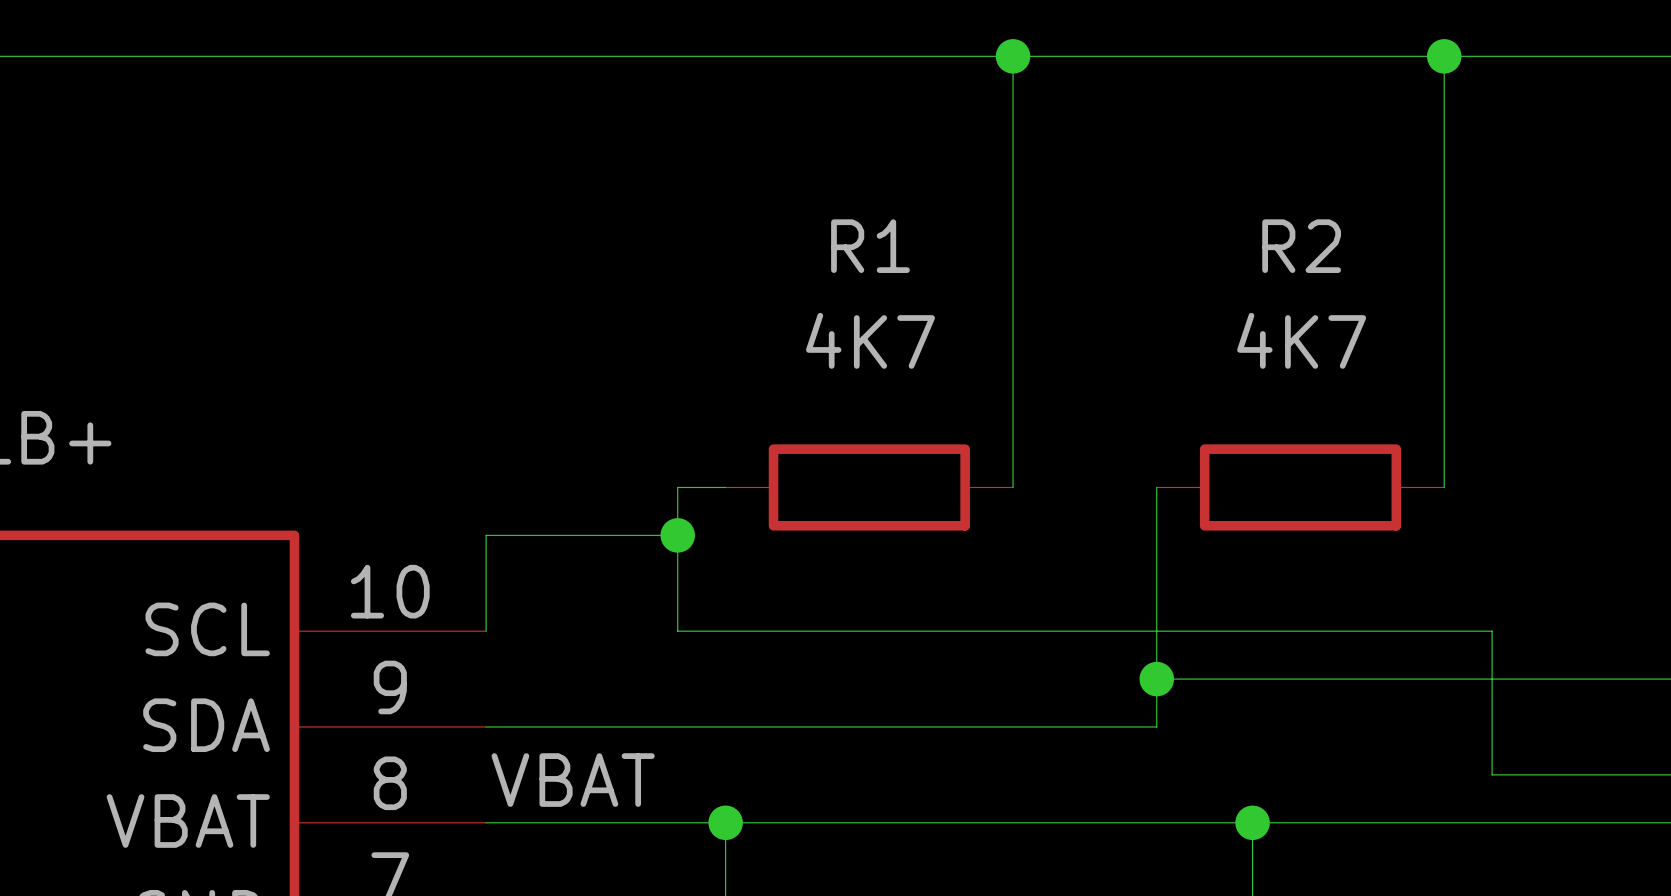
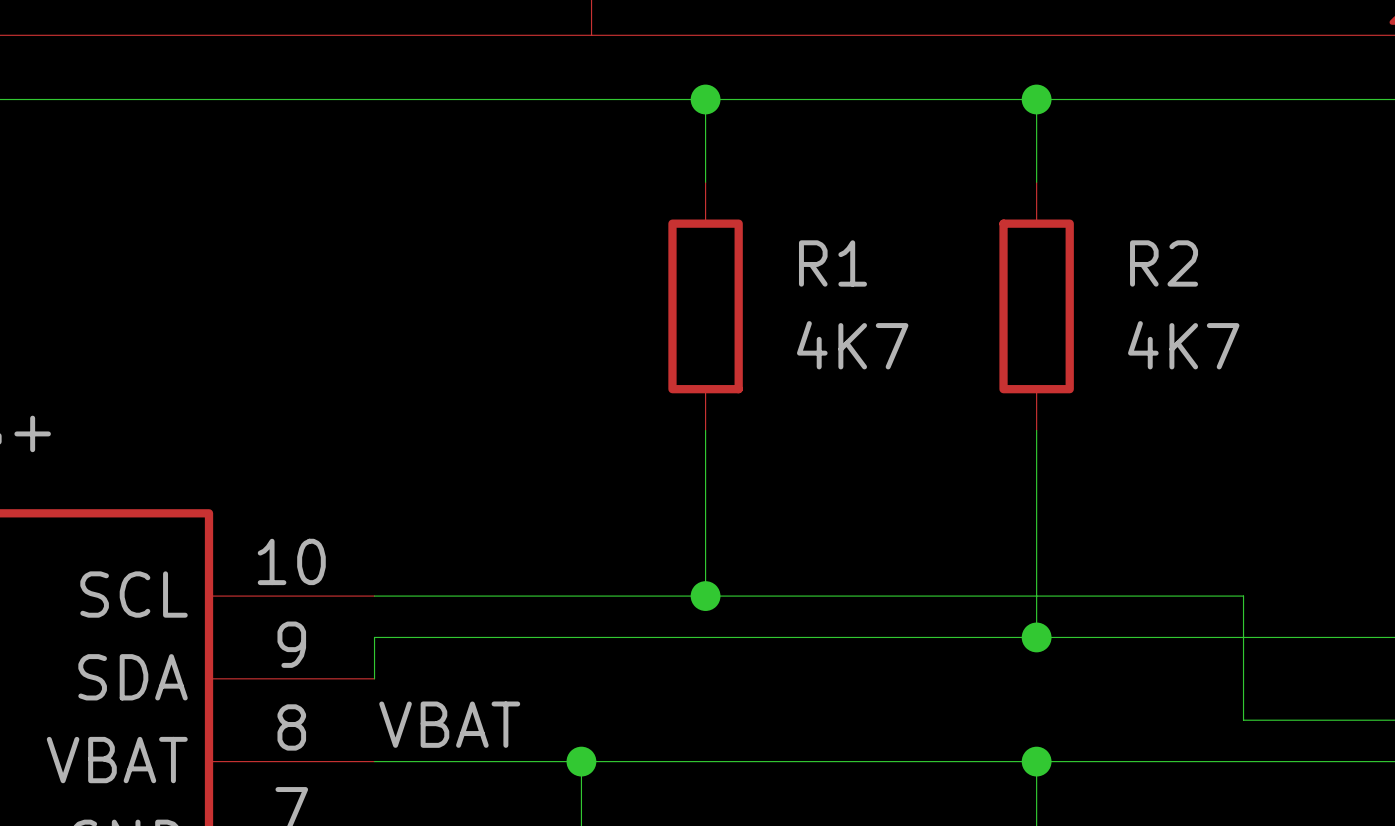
wire: none -> (705, 99) (705, 182)
junction: none -> (705, 99)
wire: (1013, 56) (1013, 487) -> none
junction: (1013, 56) -> none
wire: none -> (1036, 99) (1036, 182)
junction: none -> (1036, 99)
wire: (1444, 56) (1444, 487) -> none
junction: (1444, 56) -> none
R1 name position: R1 (870, 246) -> R1 (832, 263)
R2 name position: R2 (1301, 246) -> R2 (1164, 263)
wire: none -> (705, 430) (705, 596)
wire: none -> (1036, 430) (1036, 637)
wire: (725, 487) (677, 487) (677, 631) -> none
R1 rotation: 0° (869, 487) -> 90° clockwise (705, 306)
R1 position: (869, 487) -> (705, 306)
wire: (1156, 487) (1156, 726) (486, 726) -> (953, 637) (374, 637) (374, 678)
R2 rotation: 0° (1300, 487) -> 90° clockwise (1036, 306)
R2 position: (1300, 487) -> (1036, 306)
wire: (677, 535) (486, 535) (486, 631) -> (540, 596) (374, 596)
junction: (677, 535) -> none
junction: none -> (705, 596)
junction position: (1156, 679) -> (1036, 637)

